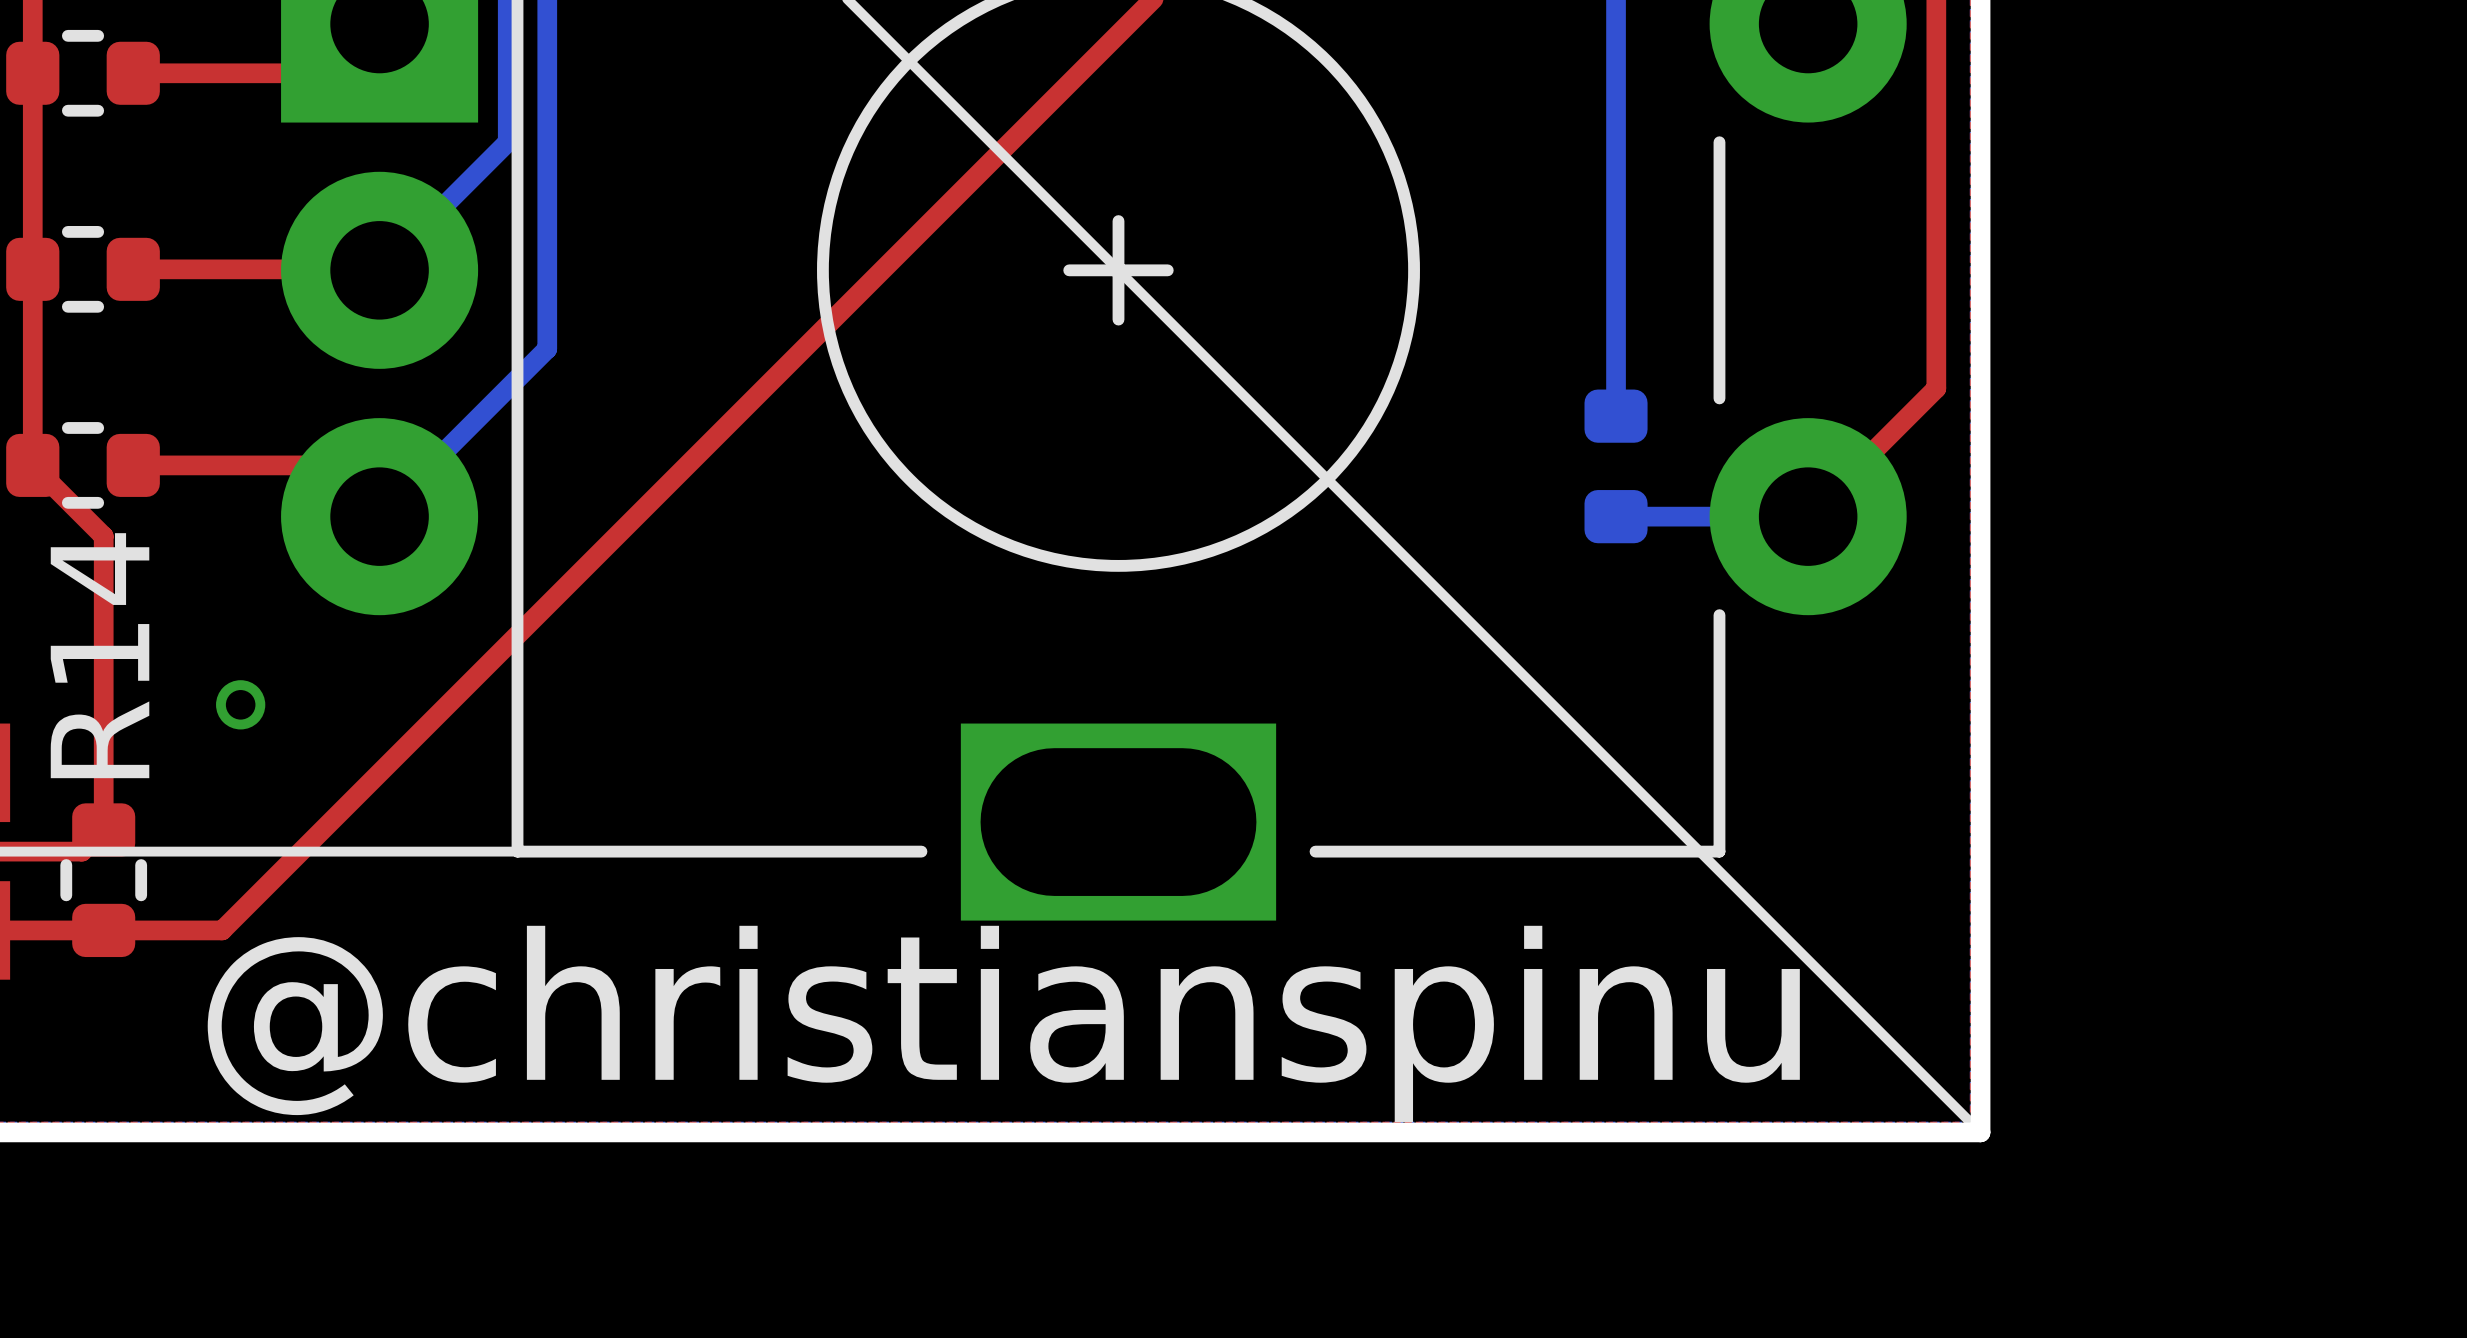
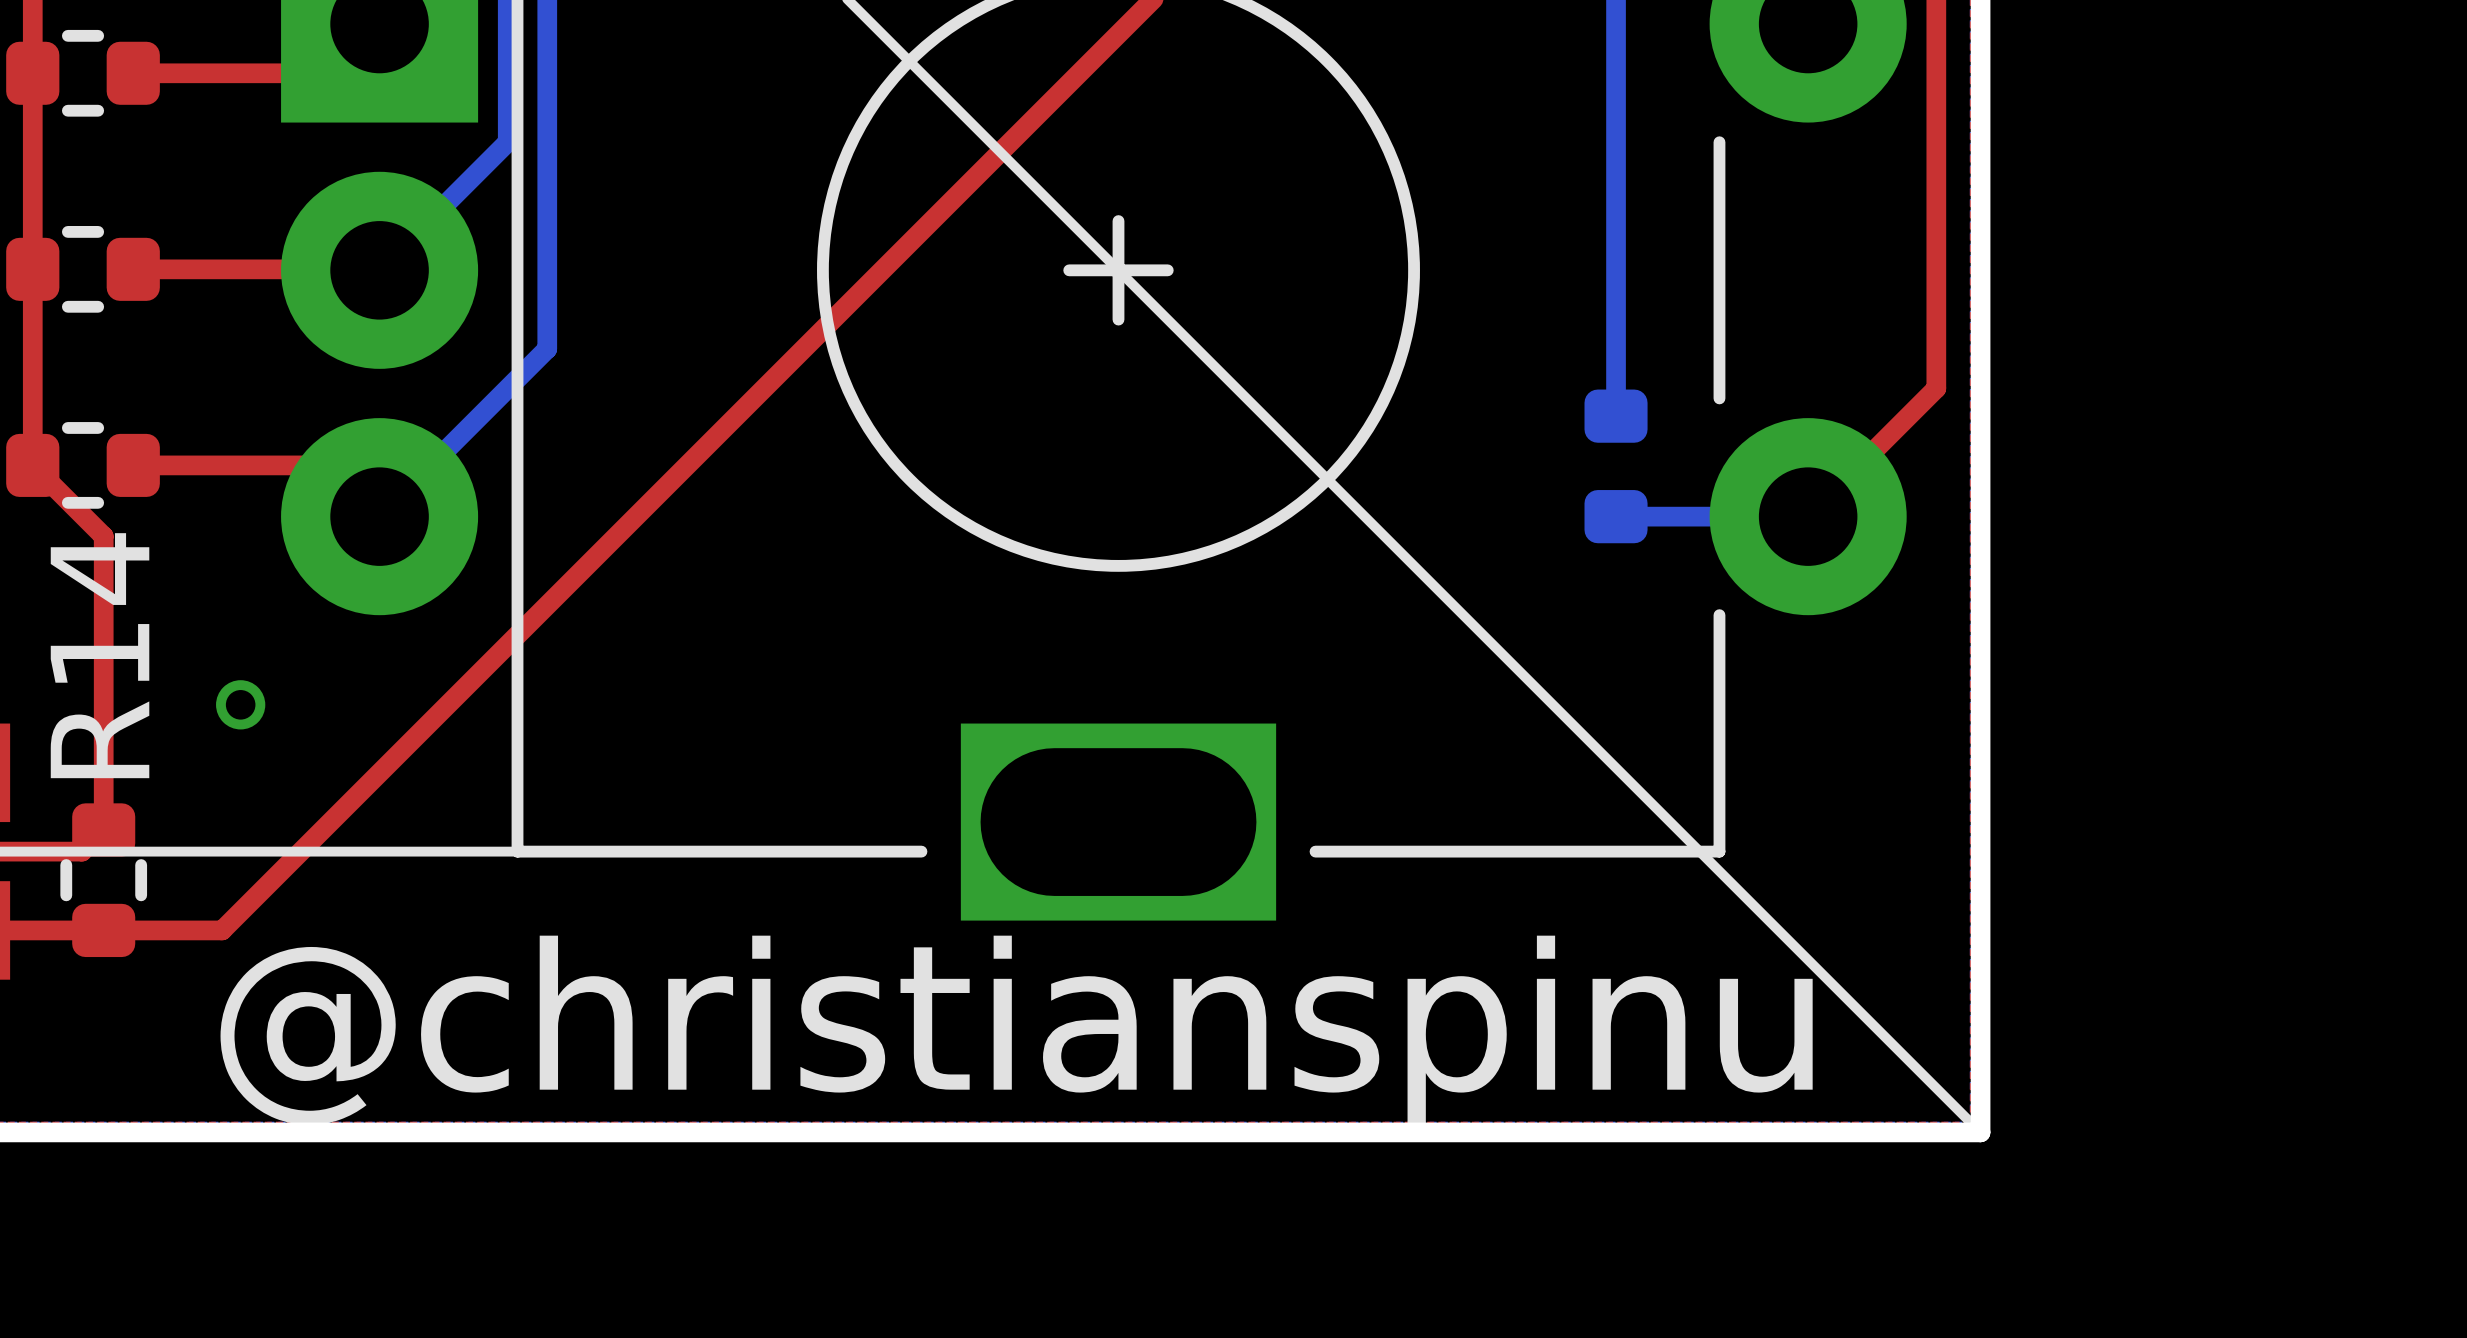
text position: @christianspinu (1003, 1023) -> @christianspinu (1016, 1033)

